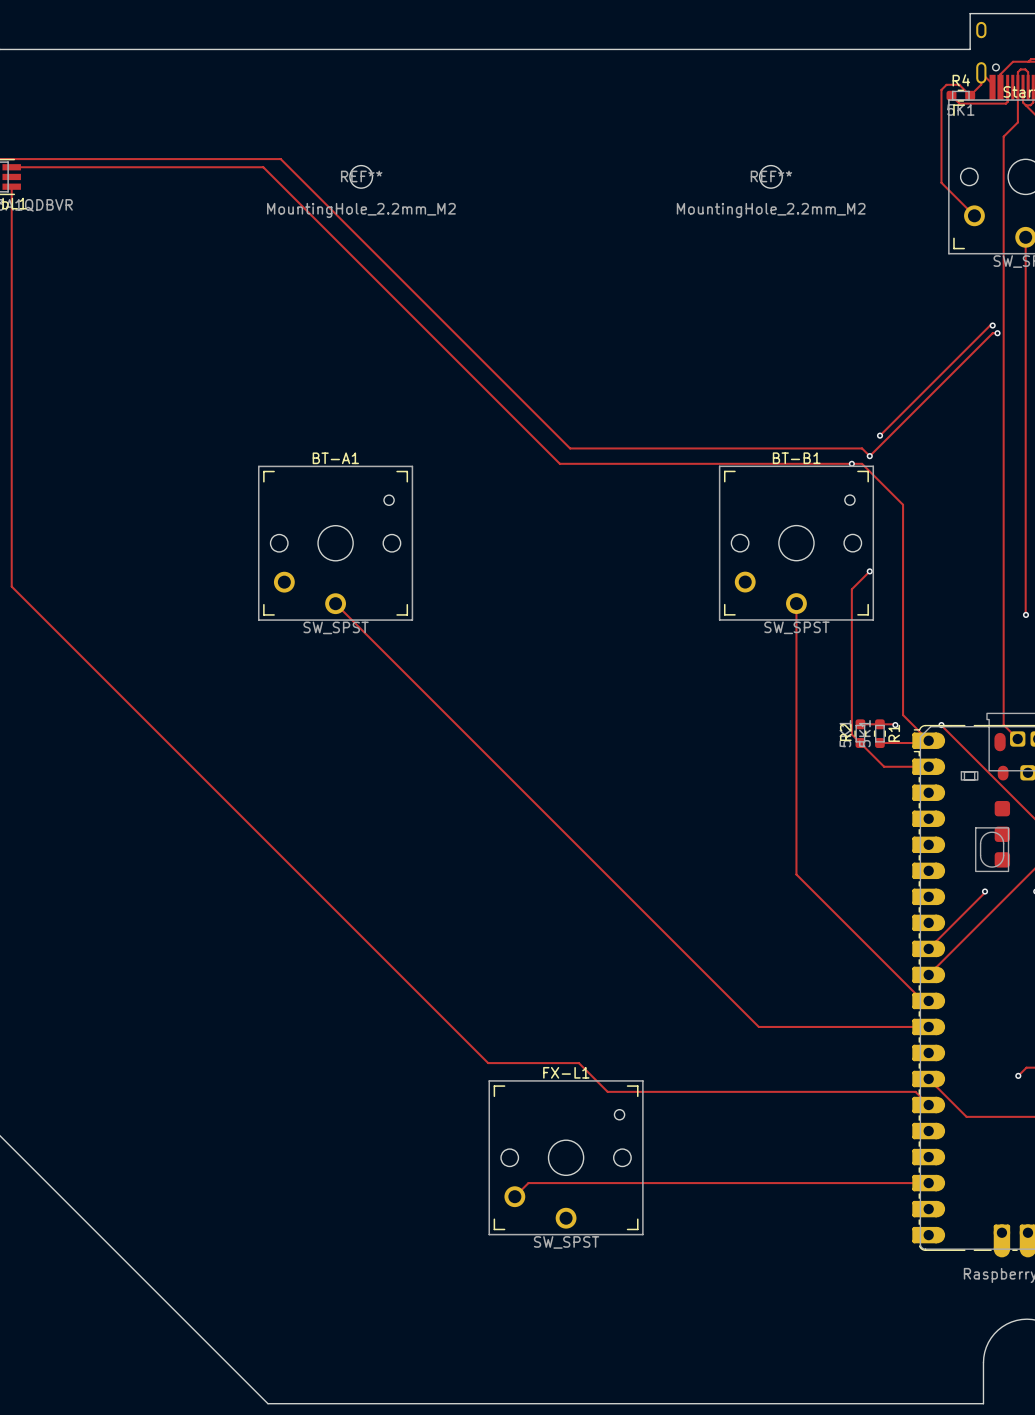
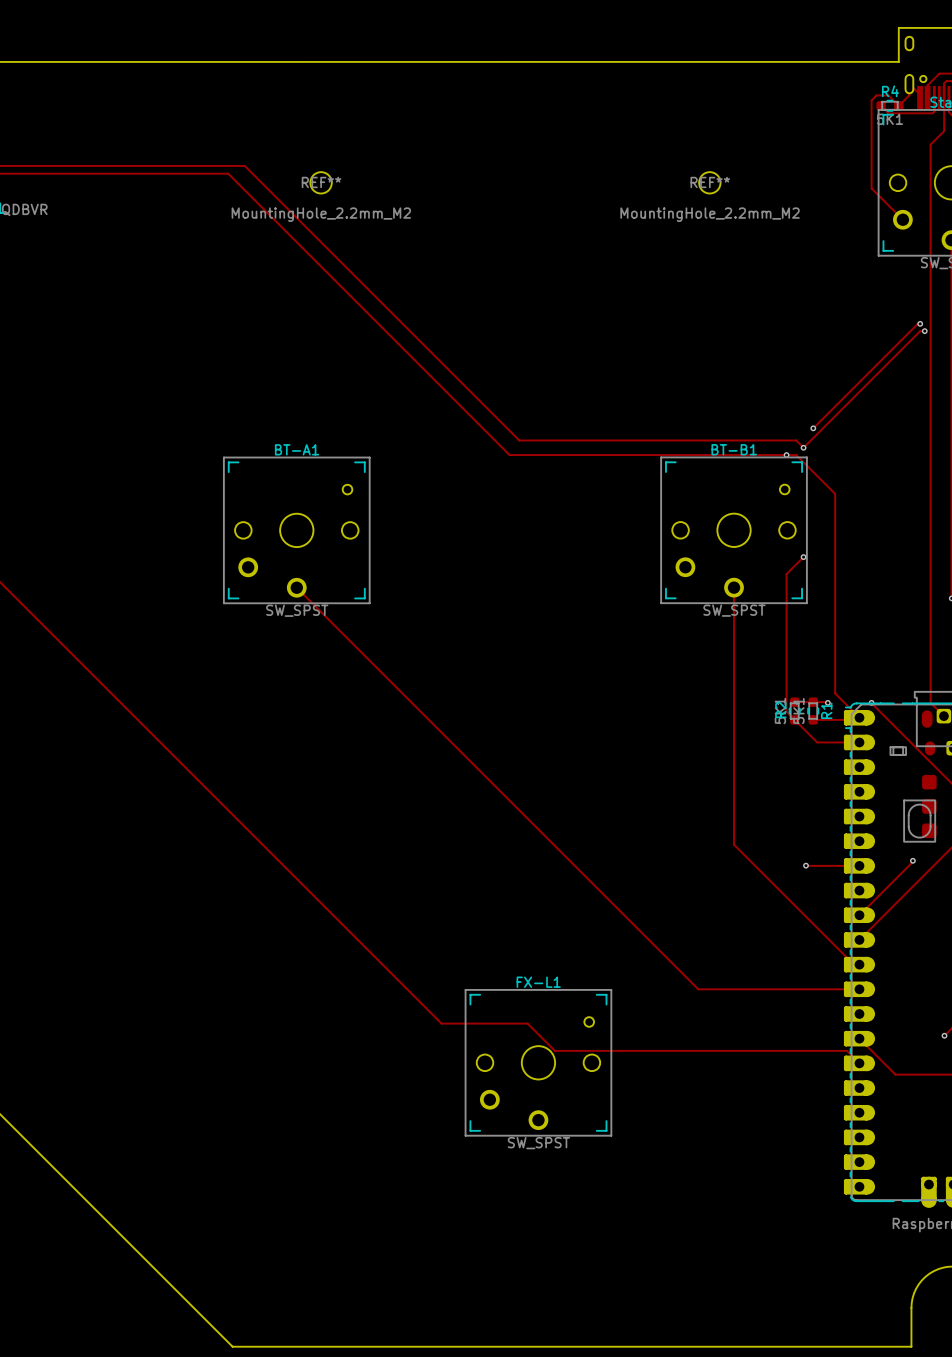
track: none -> (806, 865) (859, 865)
via: none -> (806, 865)
FX-L1 position: (566, 1157) -> (538, 1062)
track: (928, 1183) (528, 1183) (514, 1196) -> none

